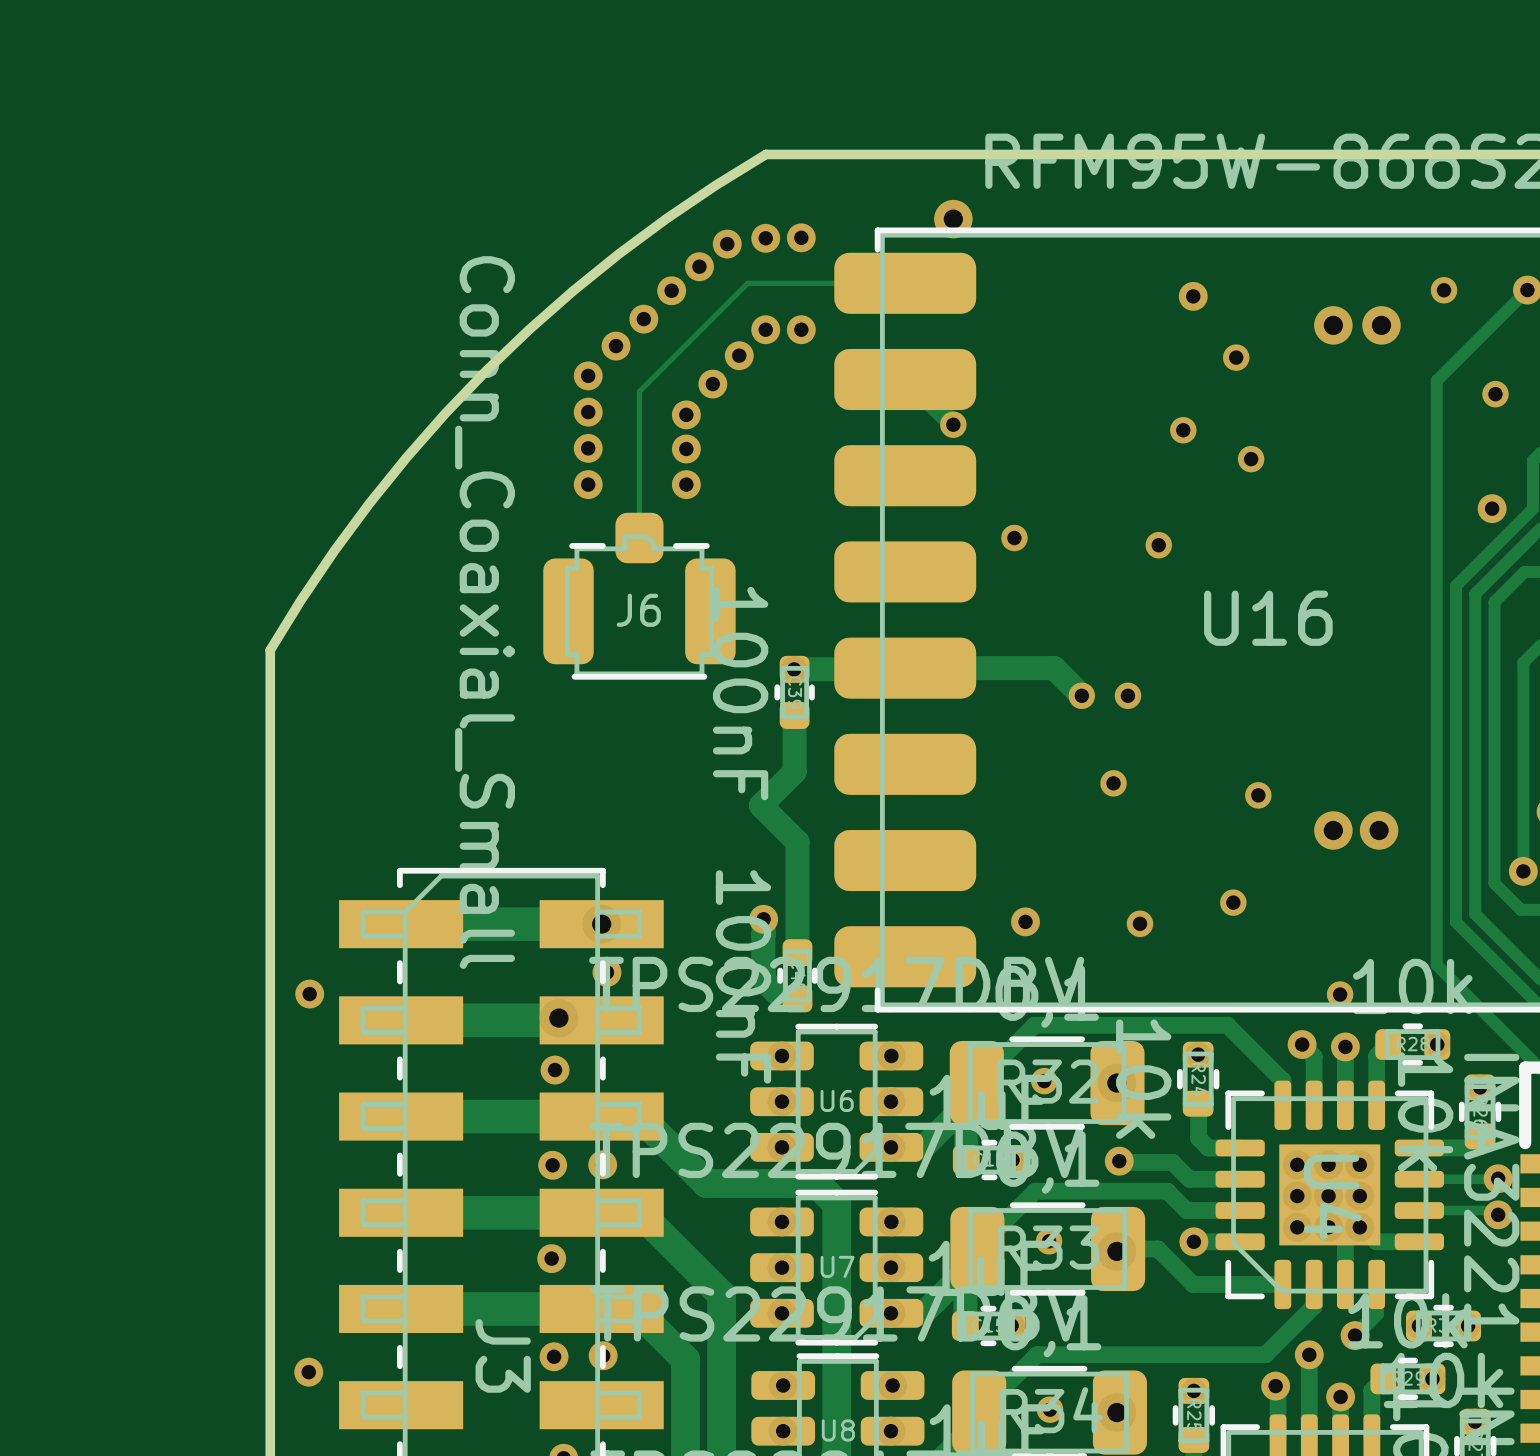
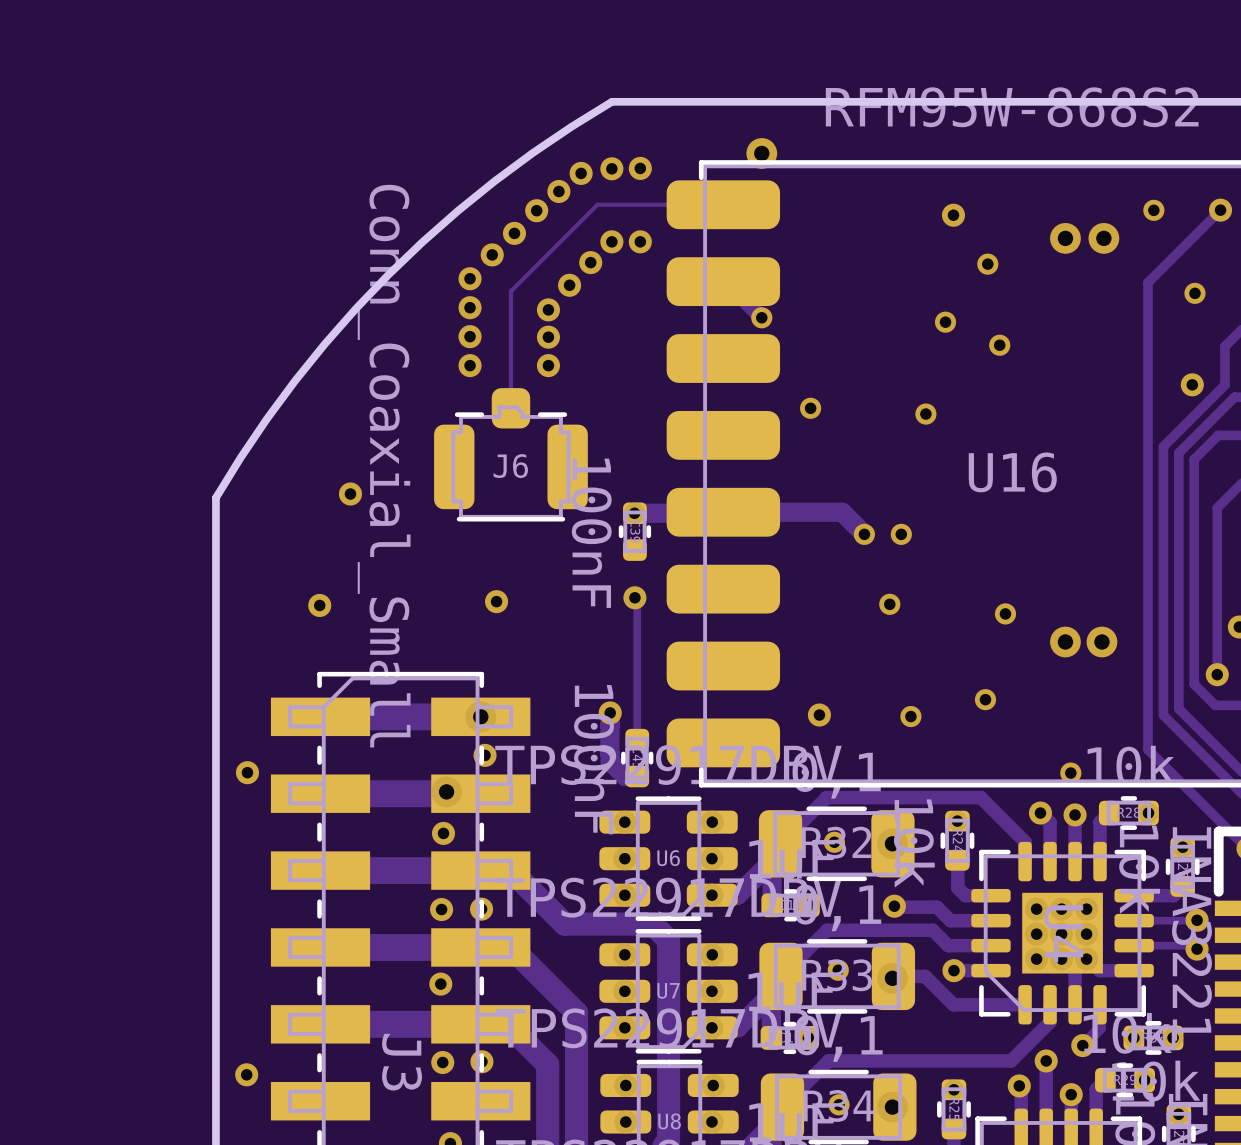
via: none -> (350, 494)
track: (794, 715) (794, 771) (760, 805) (797, 842) -> (634, 597) (637, 600) (637, 651)
via: none -> (634, 597)
via: none -> (496, 601)
via: none -> (319, 605)
track width: thick (797, 842) (797, 952) -> thin (637, 651) (637, 739)

